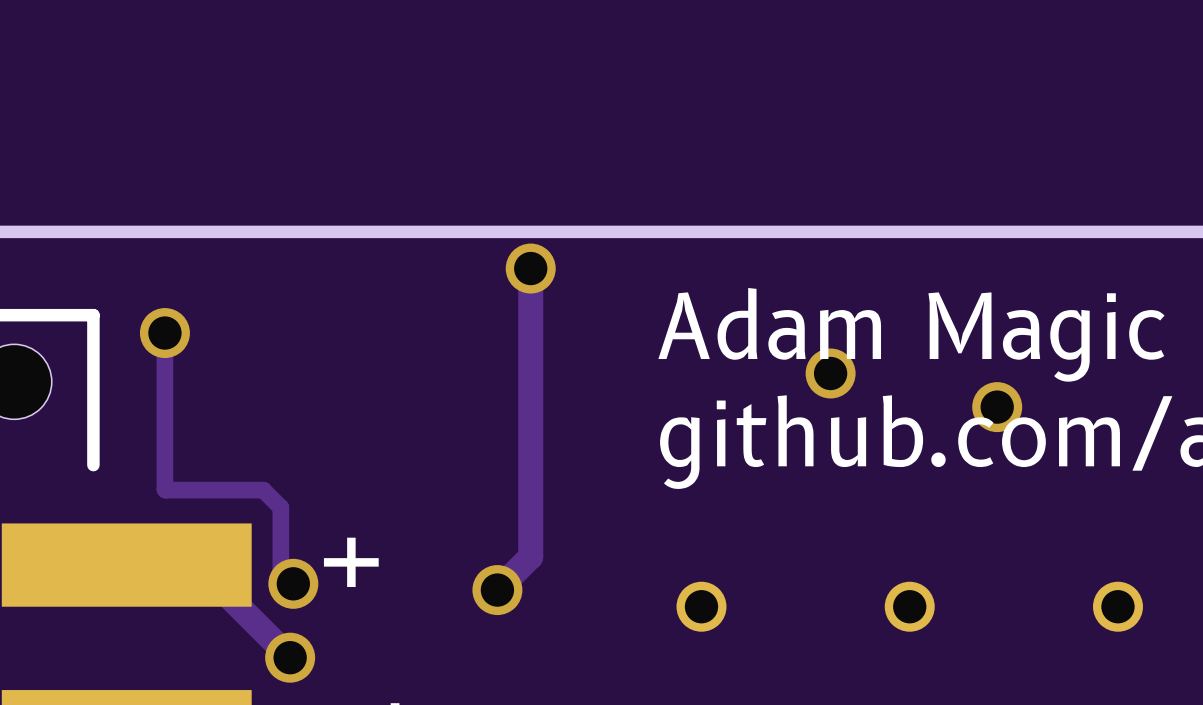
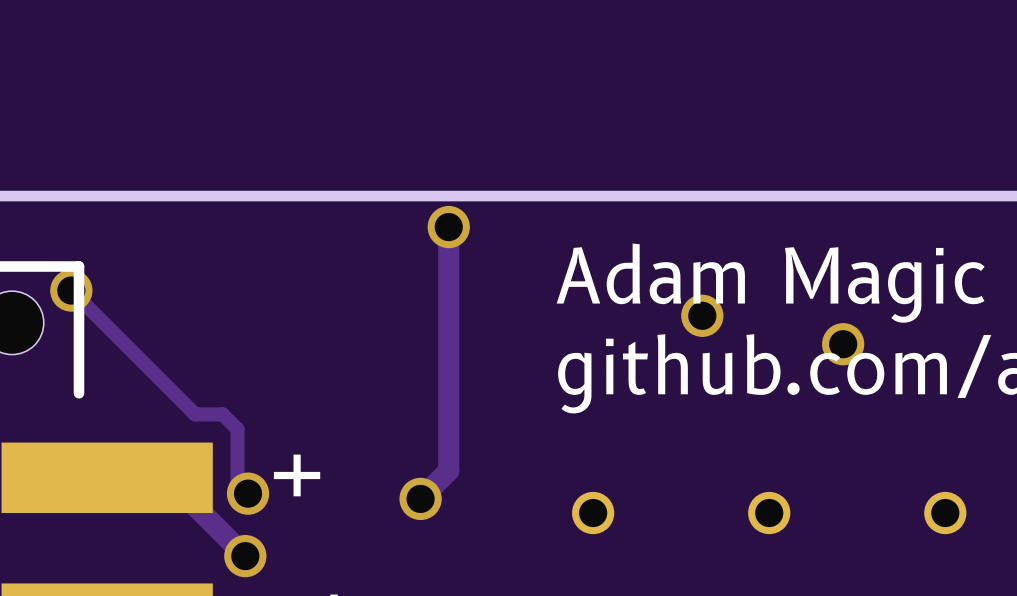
track: (164, 333) (164, 489) -> none
via position: (164, 333) -> (71, 290)
track: (230, 490) (165, 490) -> (195, 414) (71, 290)

